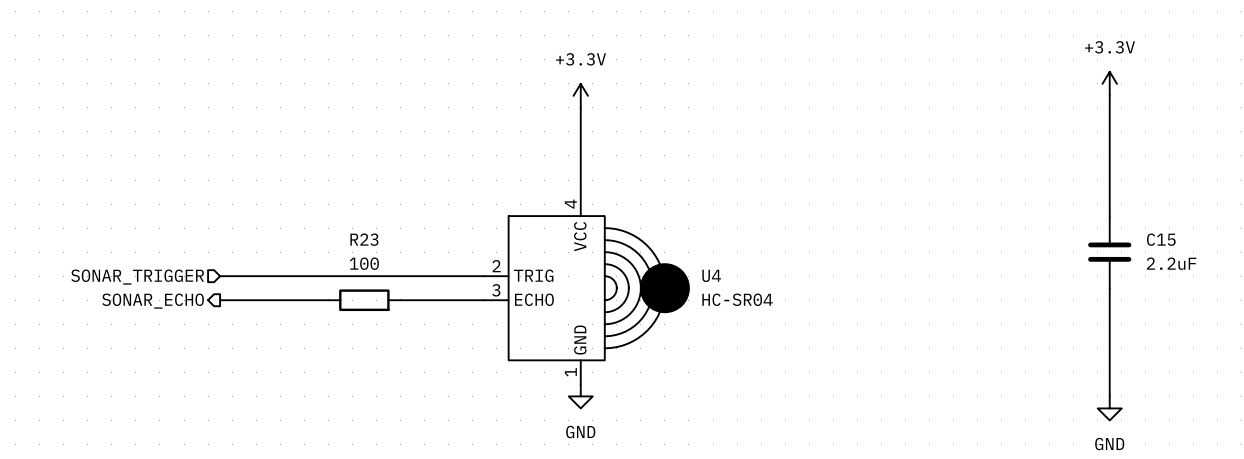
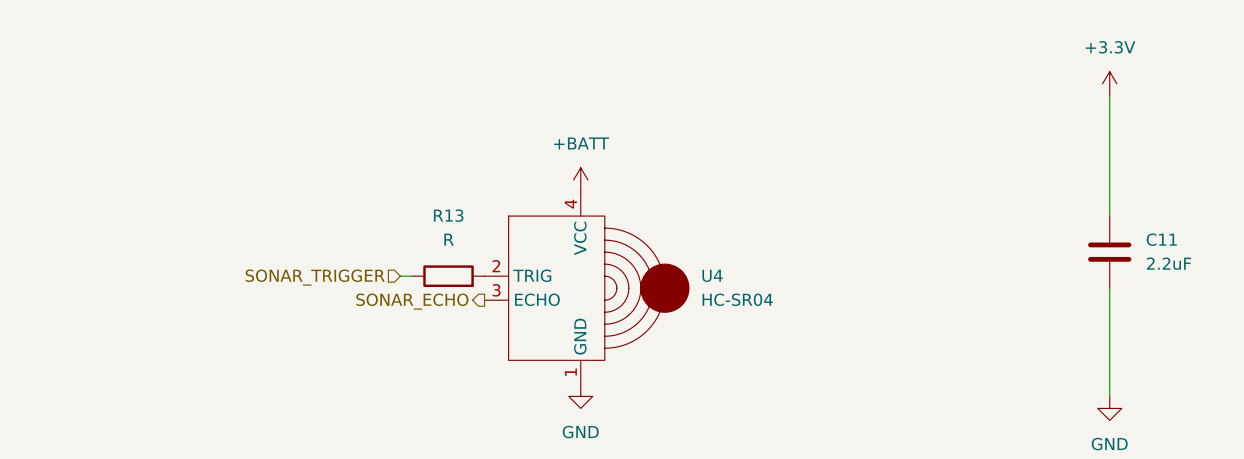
power symbol: +3.3V (580, 95) -> none
wire: (580, 107) (580, 192) -> none
power symbol: none -> +BATT (580, 180)
C15 name: C15 (1161, 239) -> C11 (1161, 239)
wire: (220, 276) (400, 276) -> none
wire: (412, 276) (484, 276) -> none
R13: none -> R (448, 276)
hierarchical label position: SONAR_TRIGGER (137, 277) -> SONAR_TRIGGER (315, 277)
wire: (220, 300) (328, 300) -> none
R23: 100 (364, 300) -> none
wire: (400, 300) (484, 300) -> none
hierarchical label: SONAR_ECHO (153, 301) -> none
hierarchical label: none -> SONAR_ECHO (412, 301)

